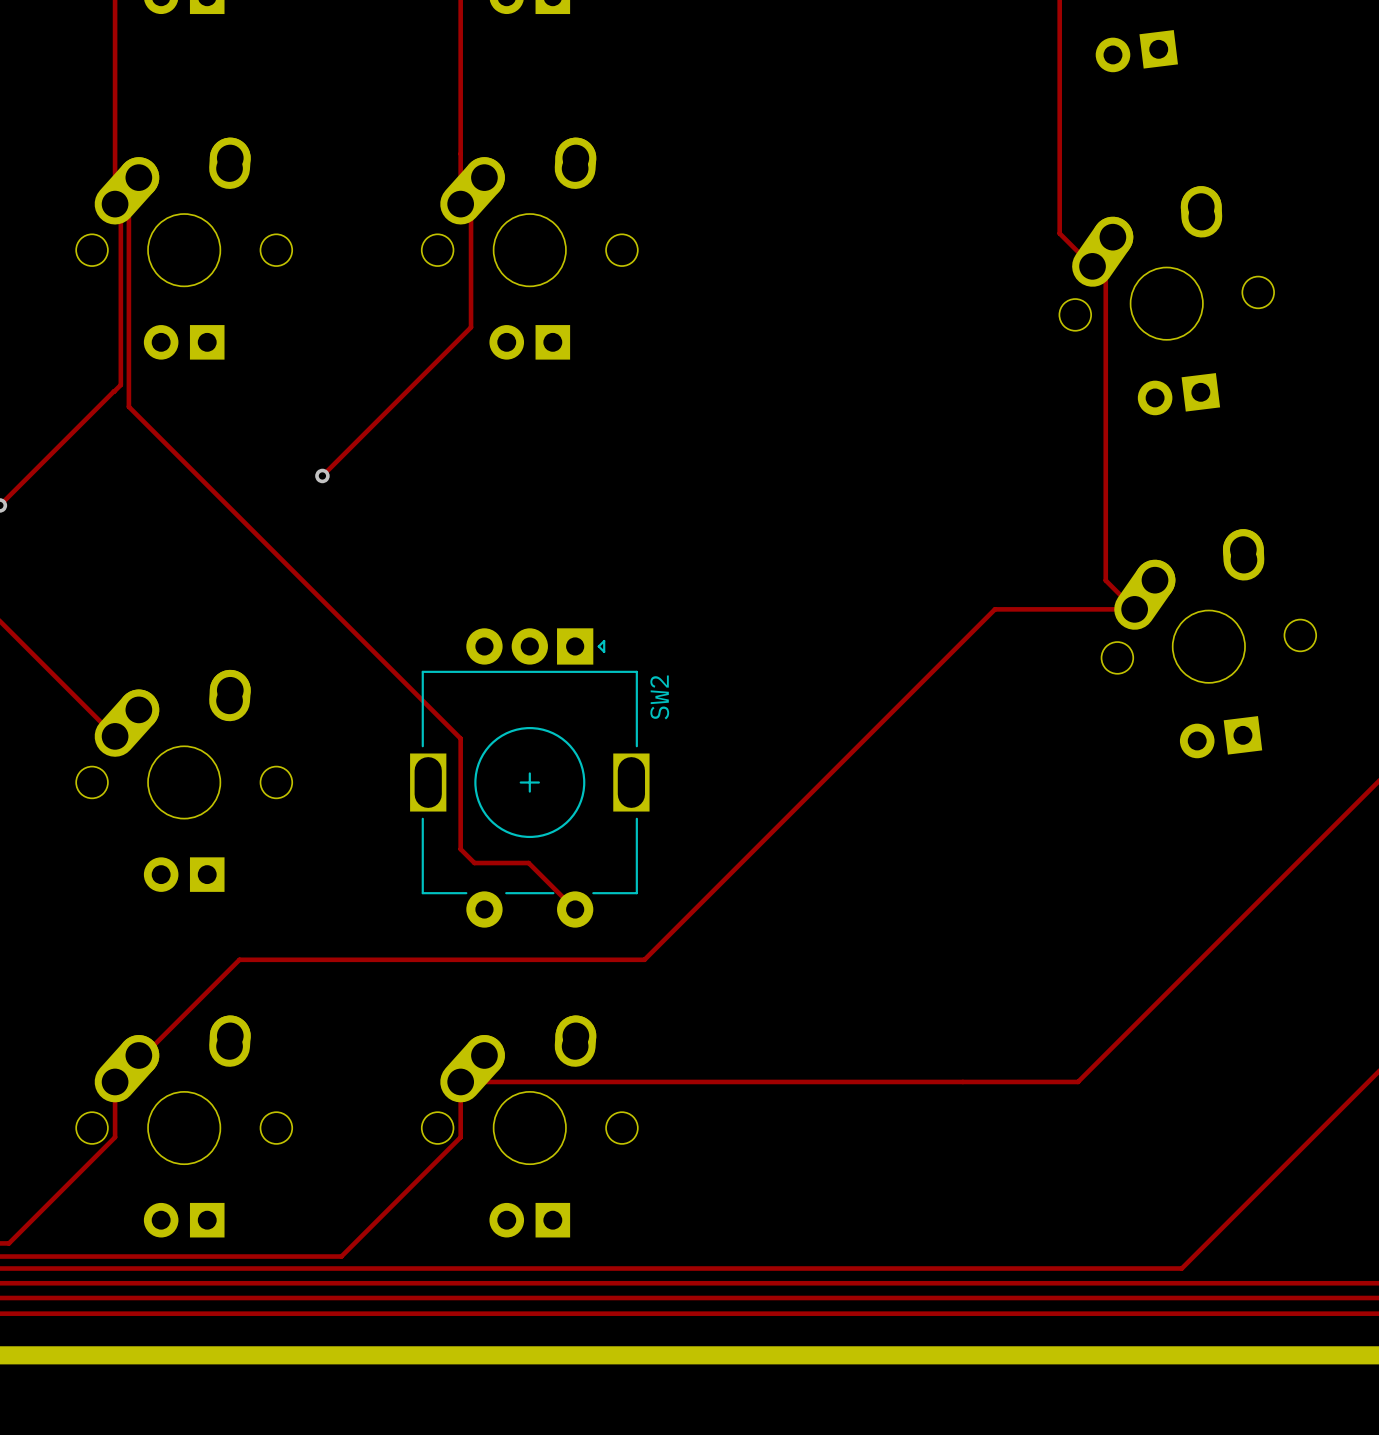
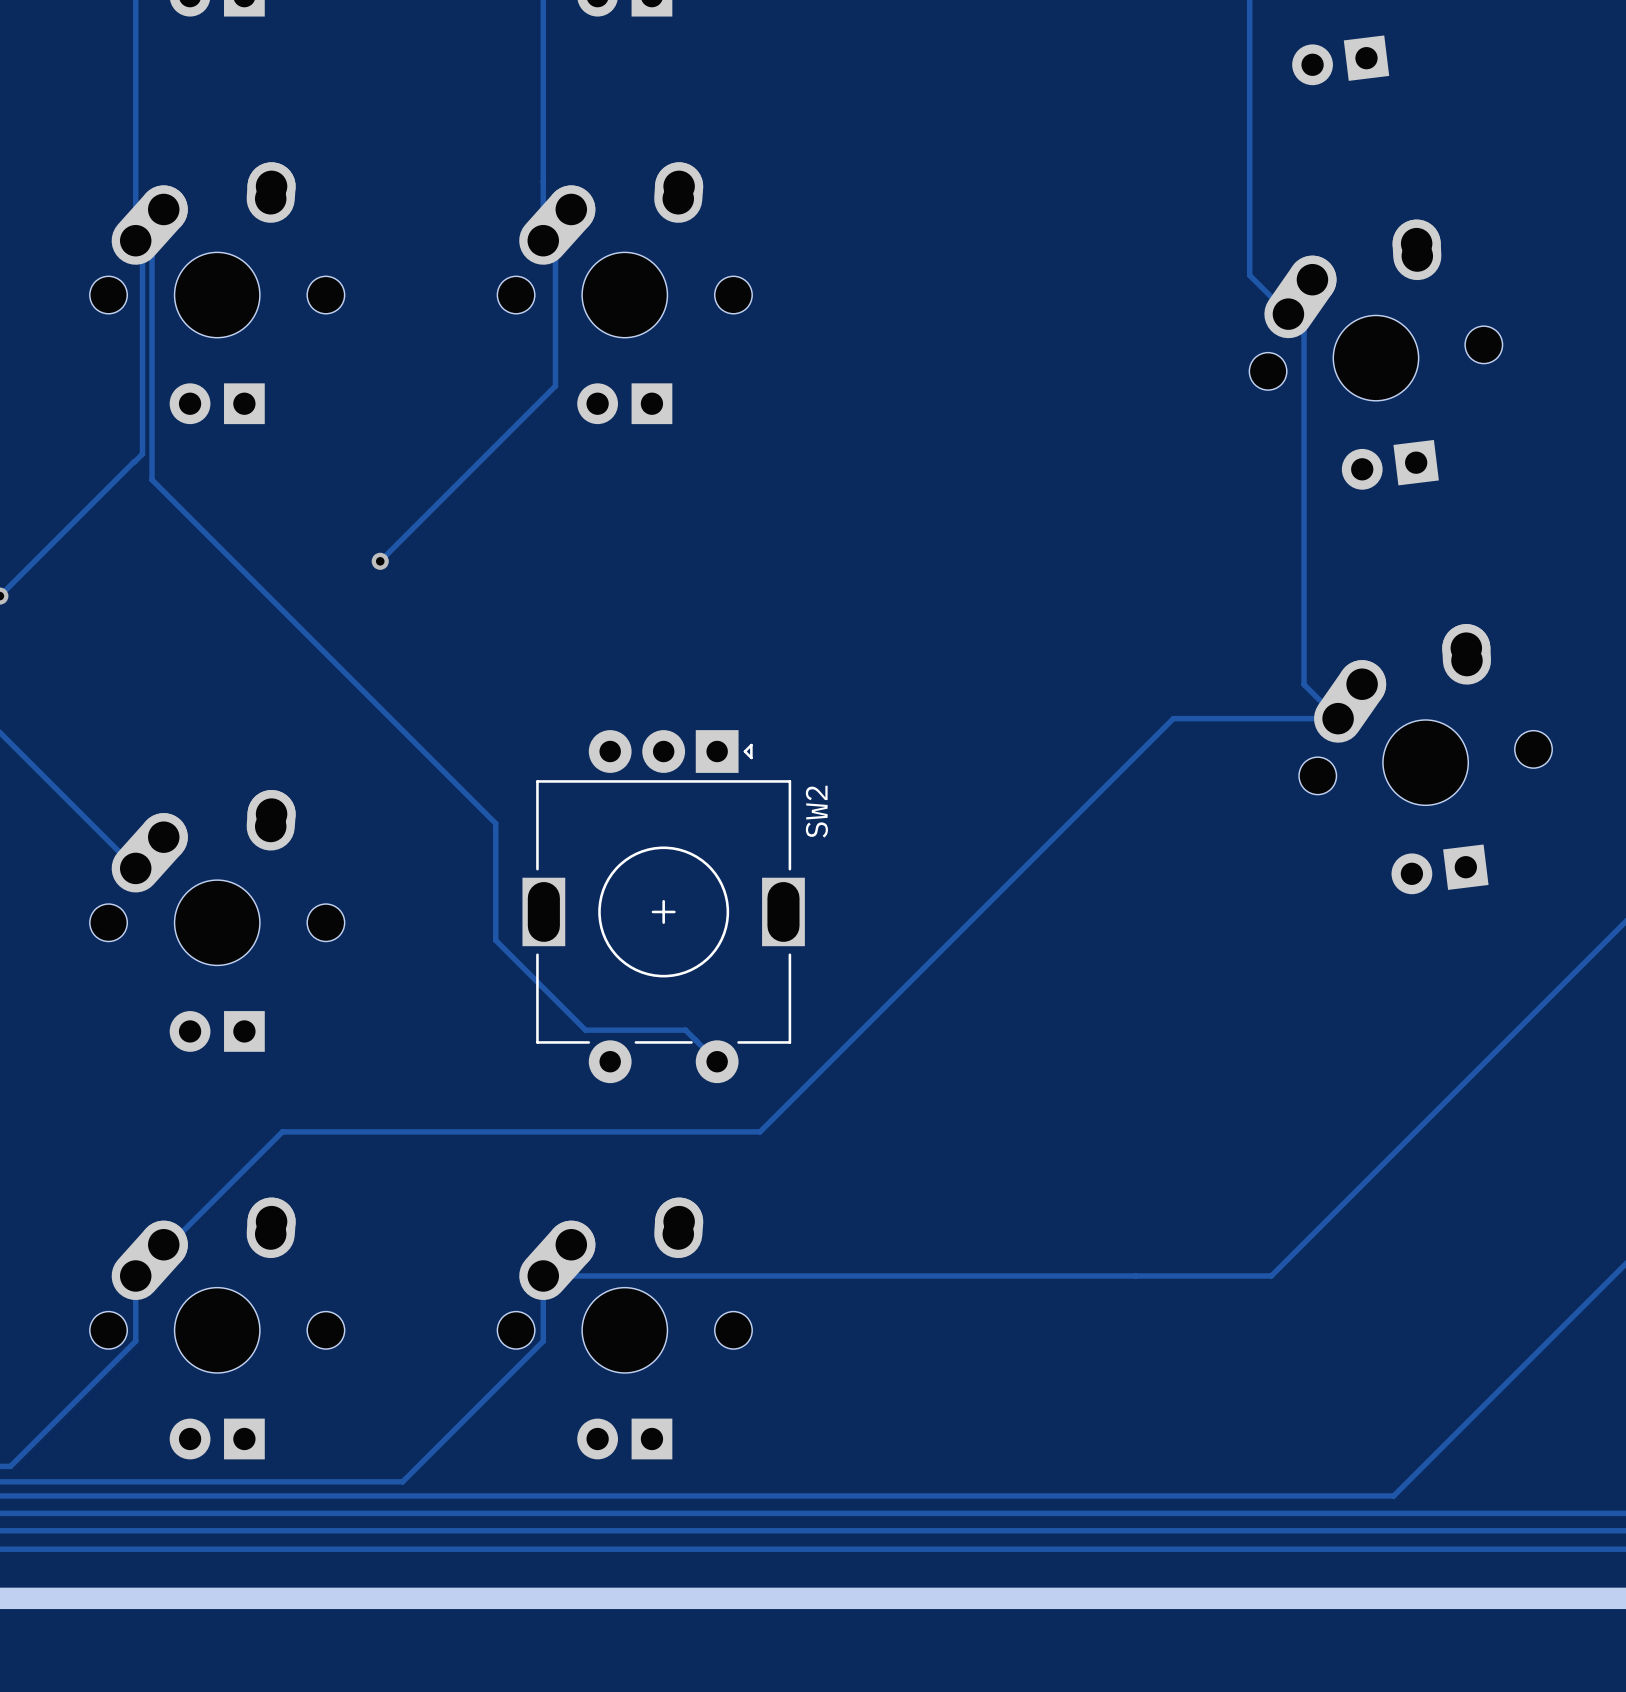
track: (420, 698) (460, 738) (460, 849) (474, 863) (528, 863) (575, 909) -> (495, 823) (495, 940) (585, 1030) (685, 1030) (717, 1061)
SW2 position: (529, 777) -> (663, 906)

